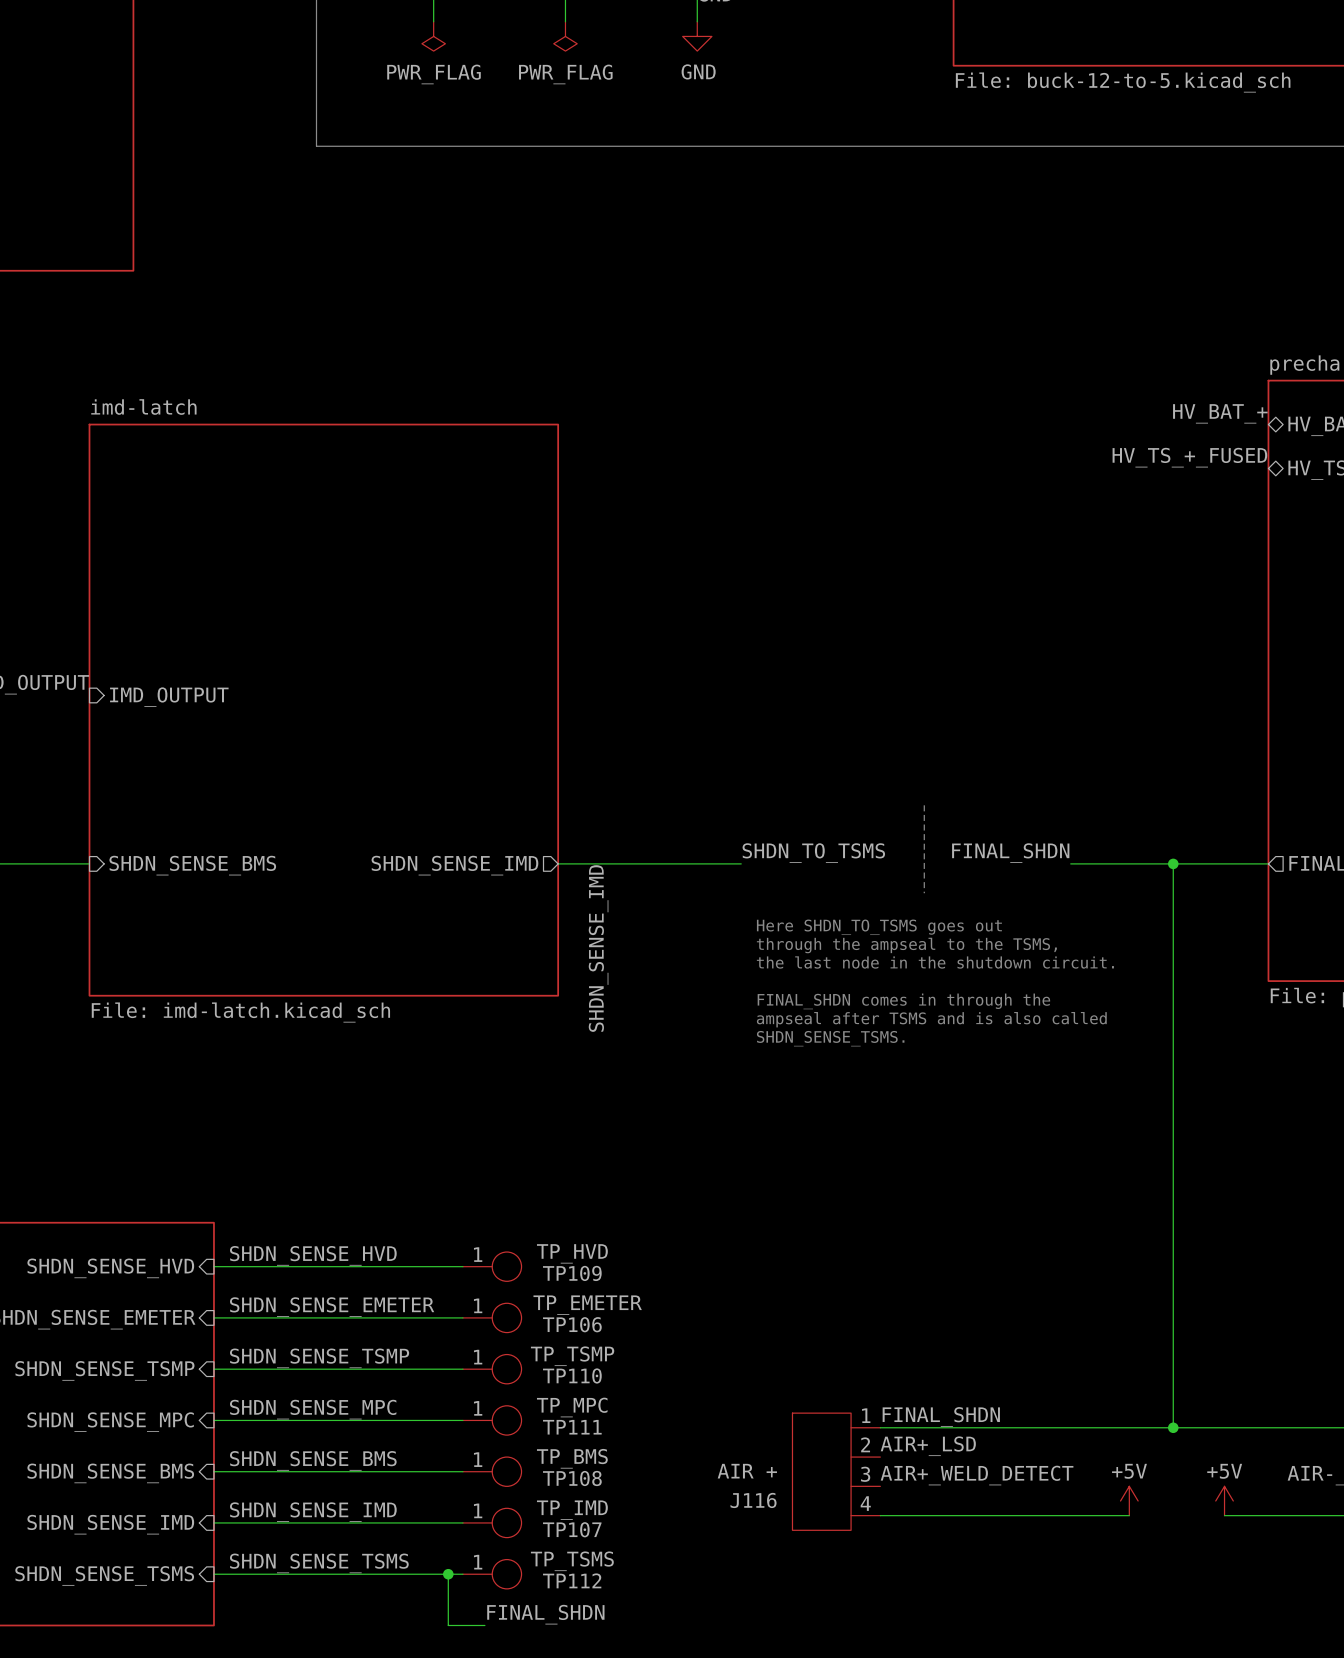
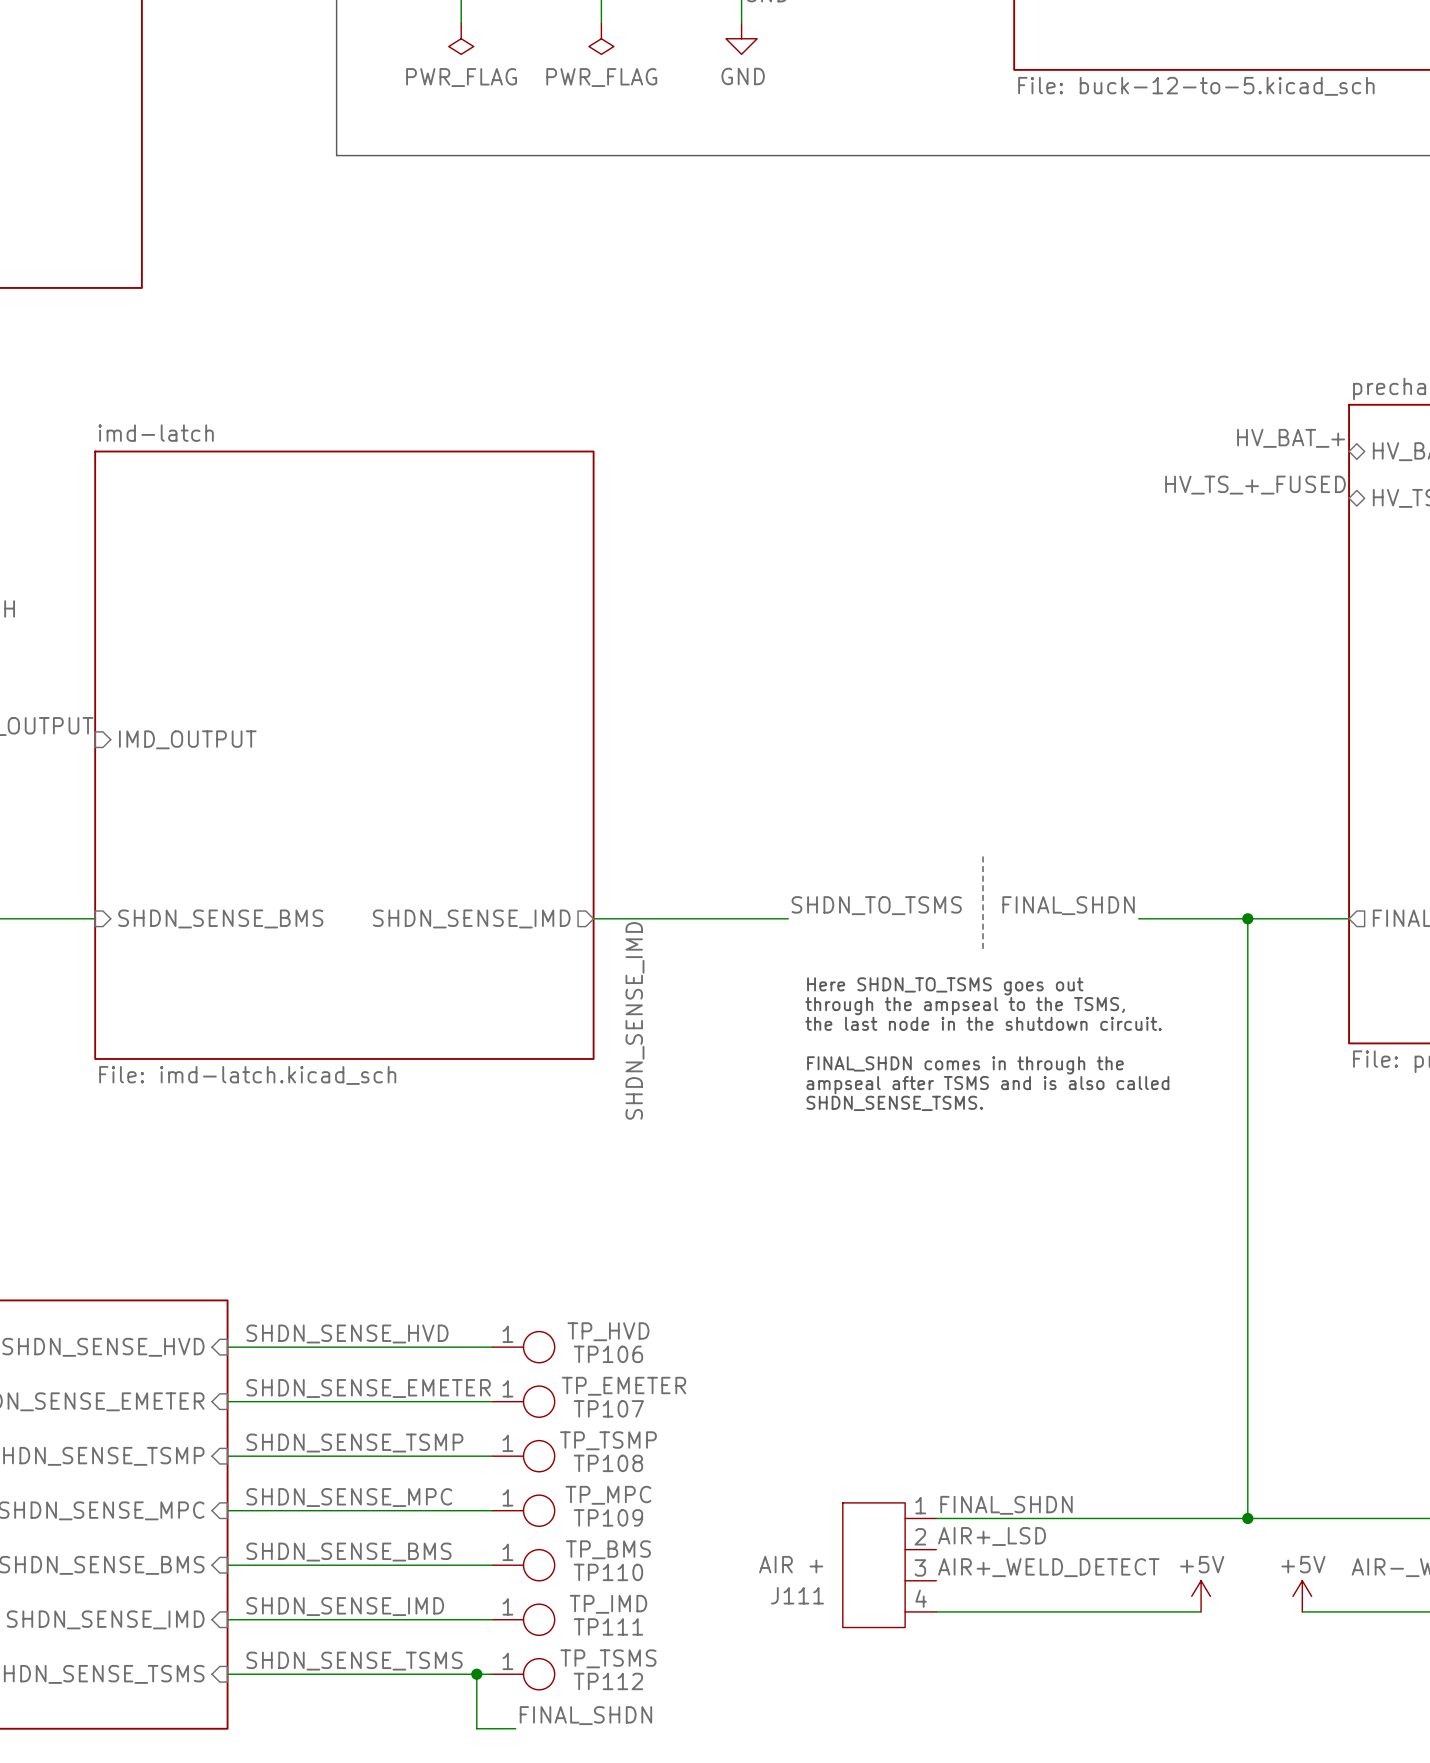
TP109 name: TP109 (572, 1273) -> TP106 (608, 1354)
TP106 name: TP106 (572, 1324) -> TP107 (608, 1408)
TP110 name: TP110 (572, 1375) -> TP108 (608, 1463)
TP111 name: TP111 (572, 1427) -> TP109 (608, 1517)
TP108 name: TP108 (572, 1478) -> TP110 (608, 1572)
J116 name: J116 (753, 1500) -> J111 (797, 1595)
TP107 name: TP107 (572, 1529) -> TP111 (608, 1626)

